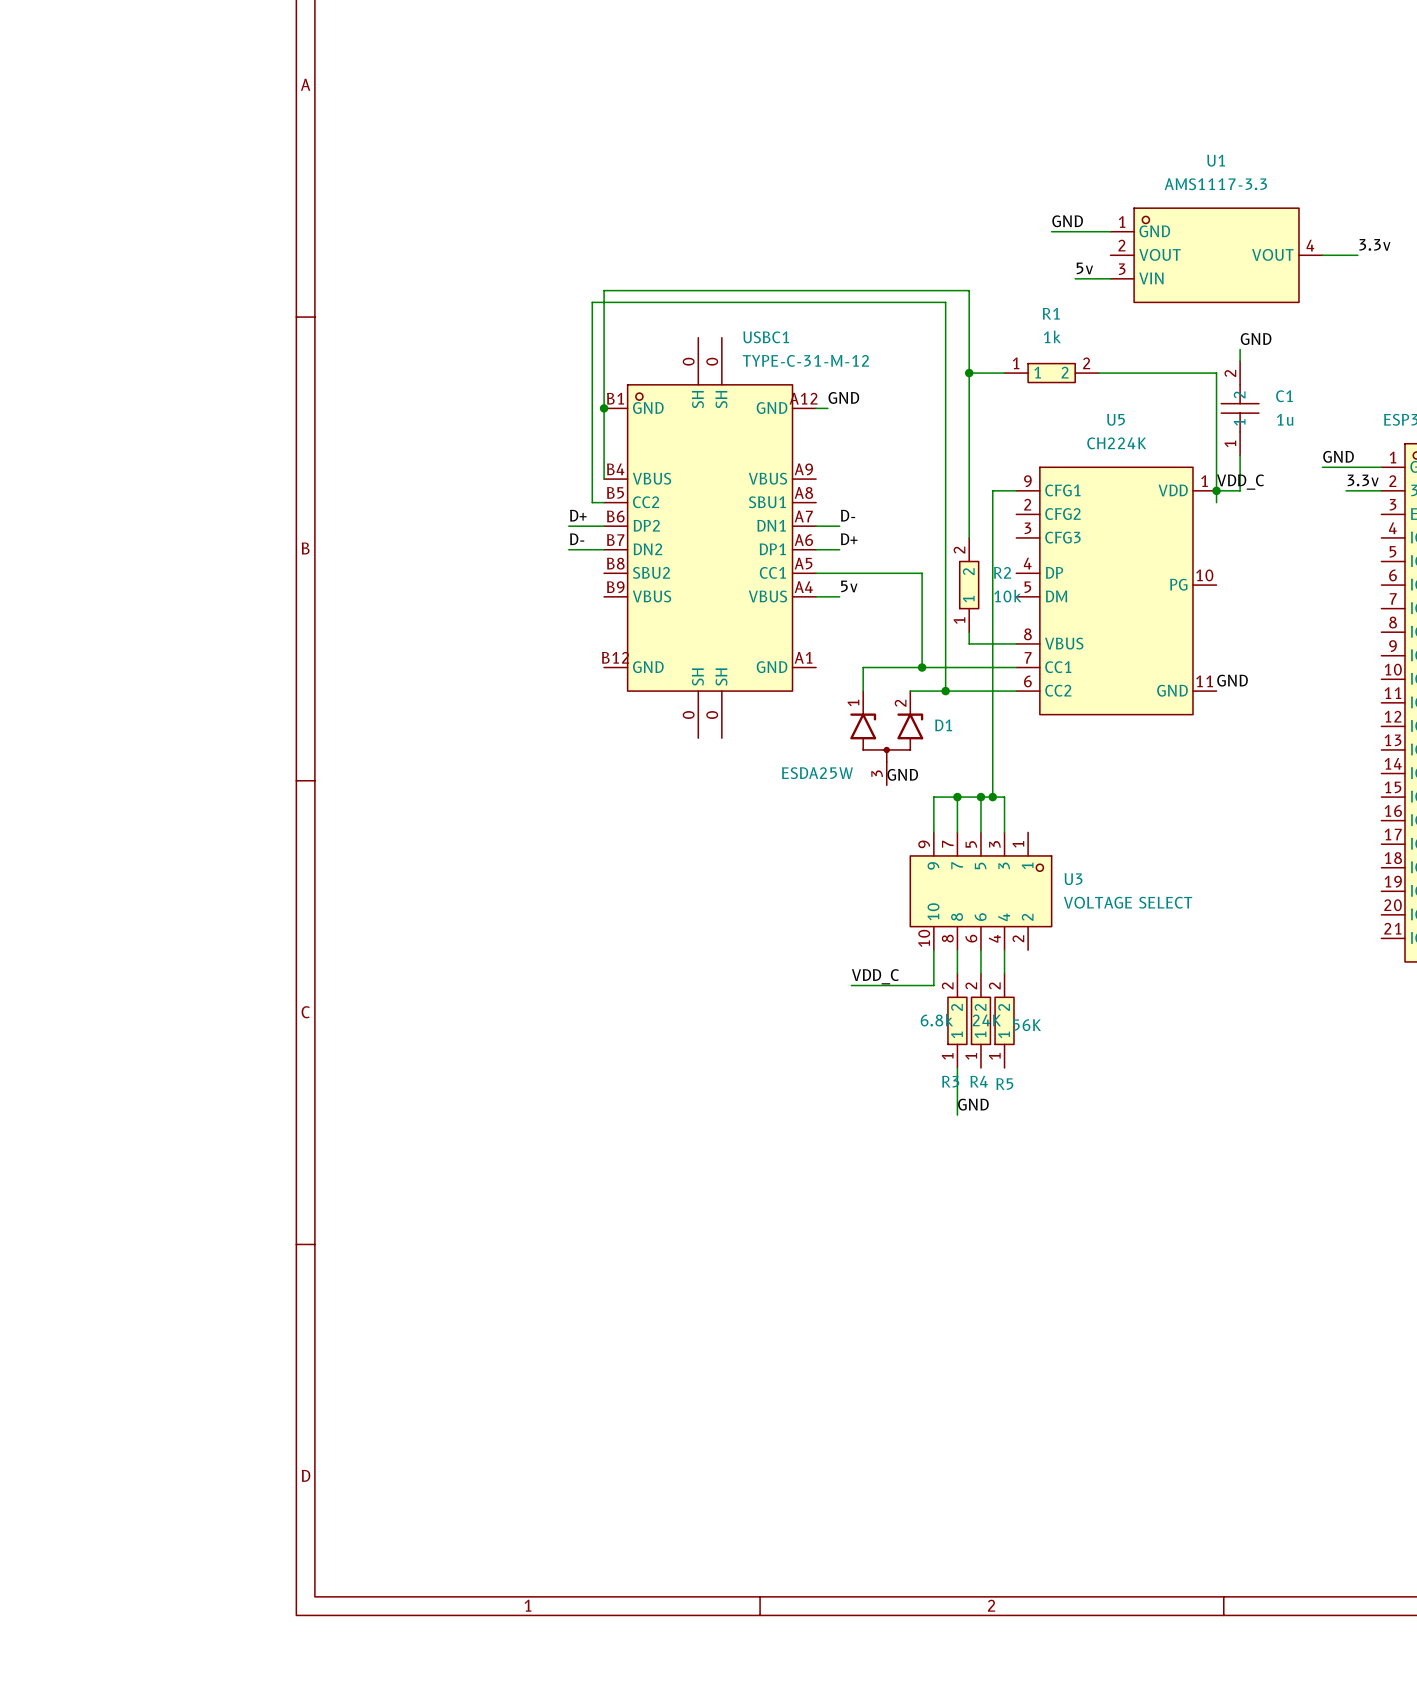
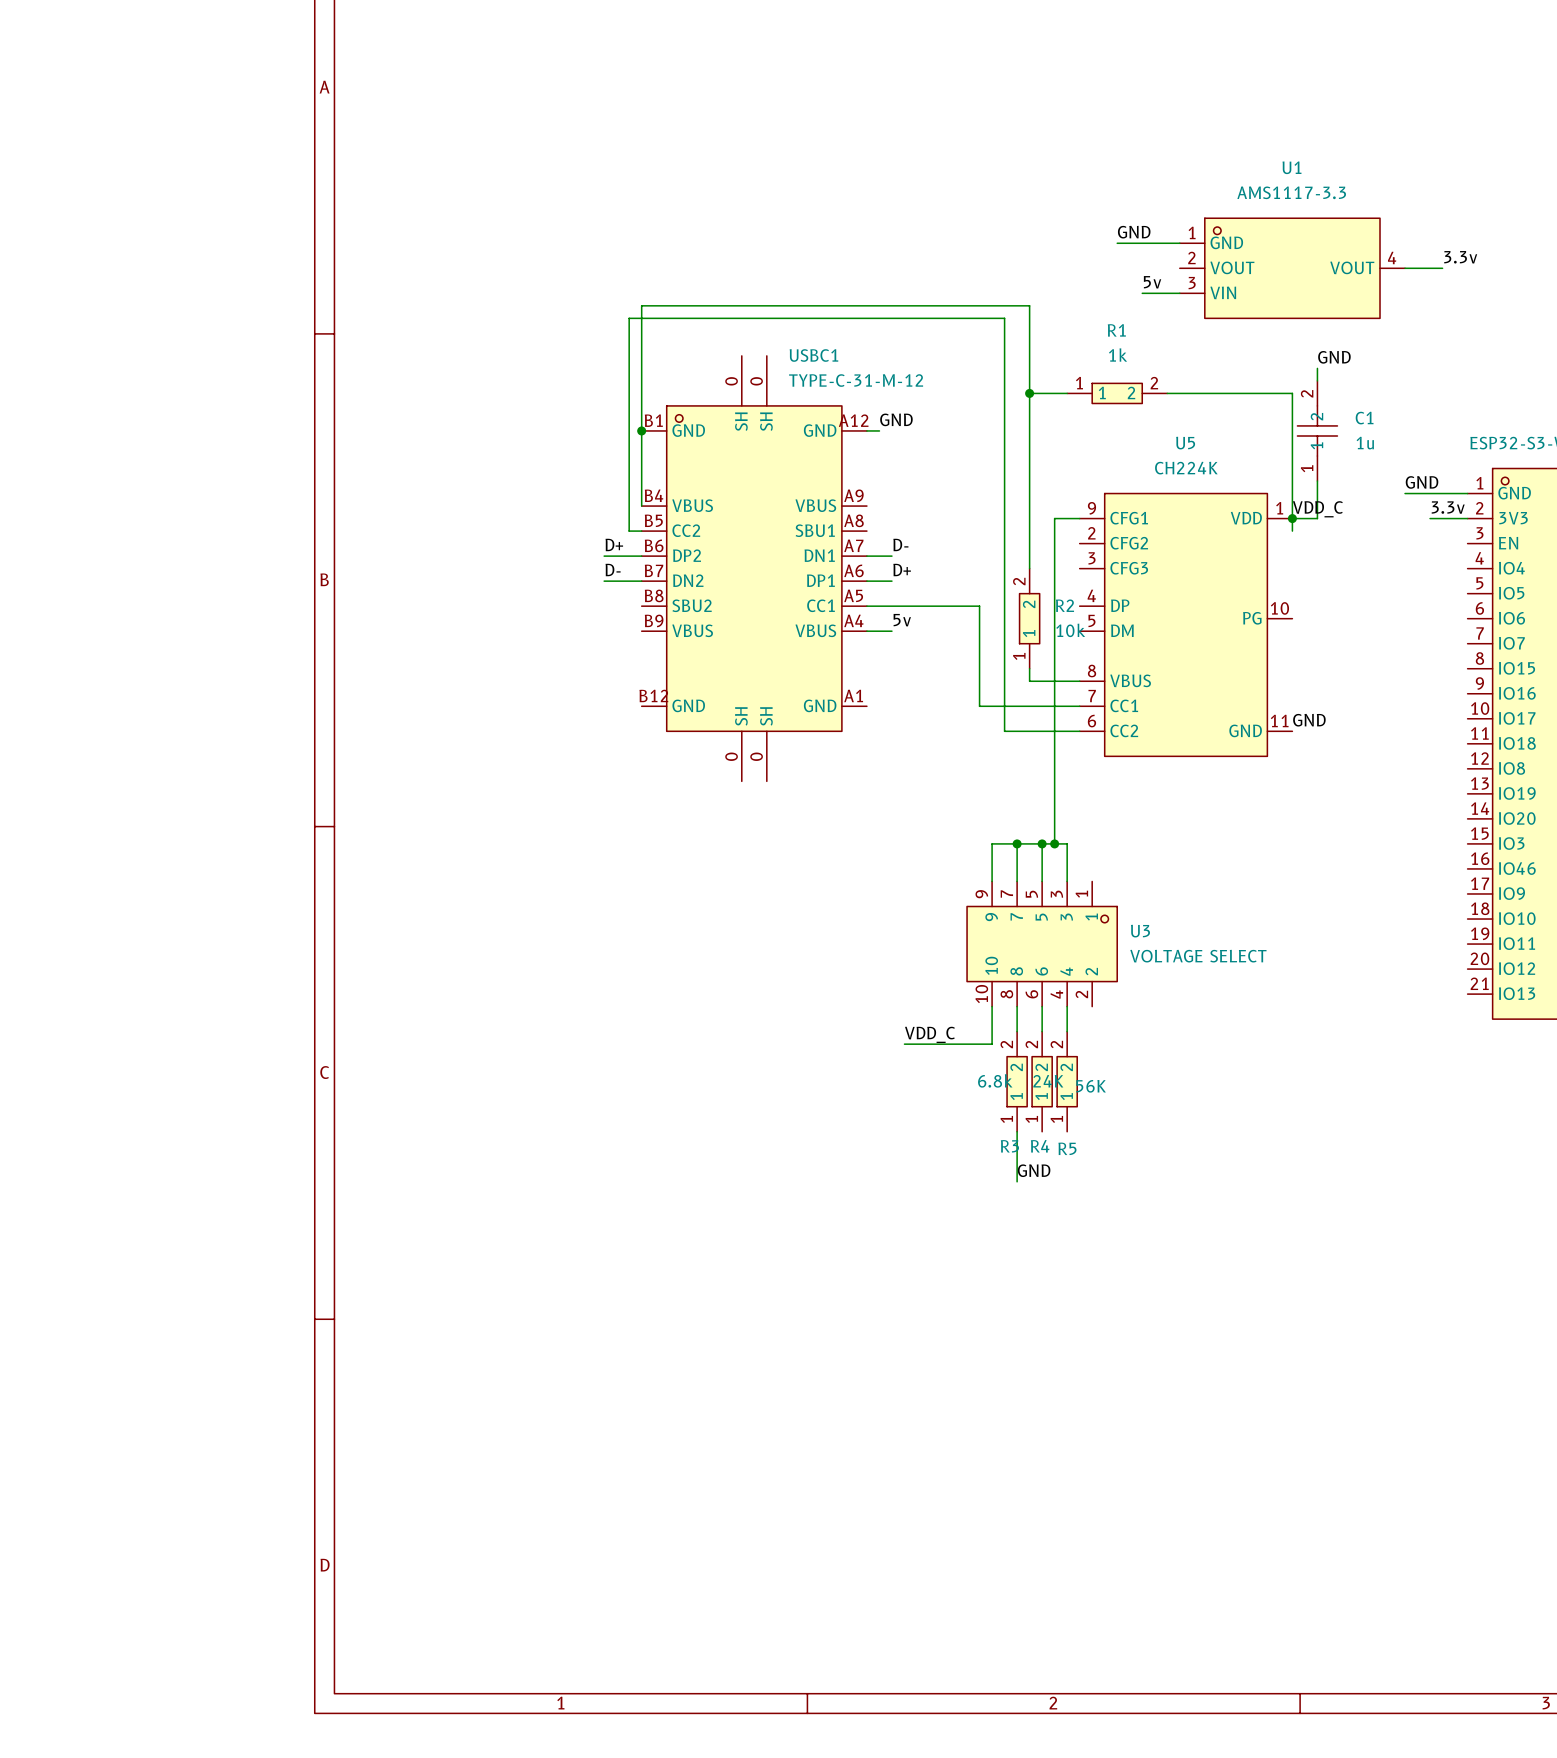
wire: (922, 667) (863, 667) (863, 691) -> none
junction: (922, 667) -> none
wire: (910, 691) (945, 691) -> none
junction: (945, 691) -> none
D1: ESDA25W (886, 738) -> none
label: GND (902, 774) -> none

